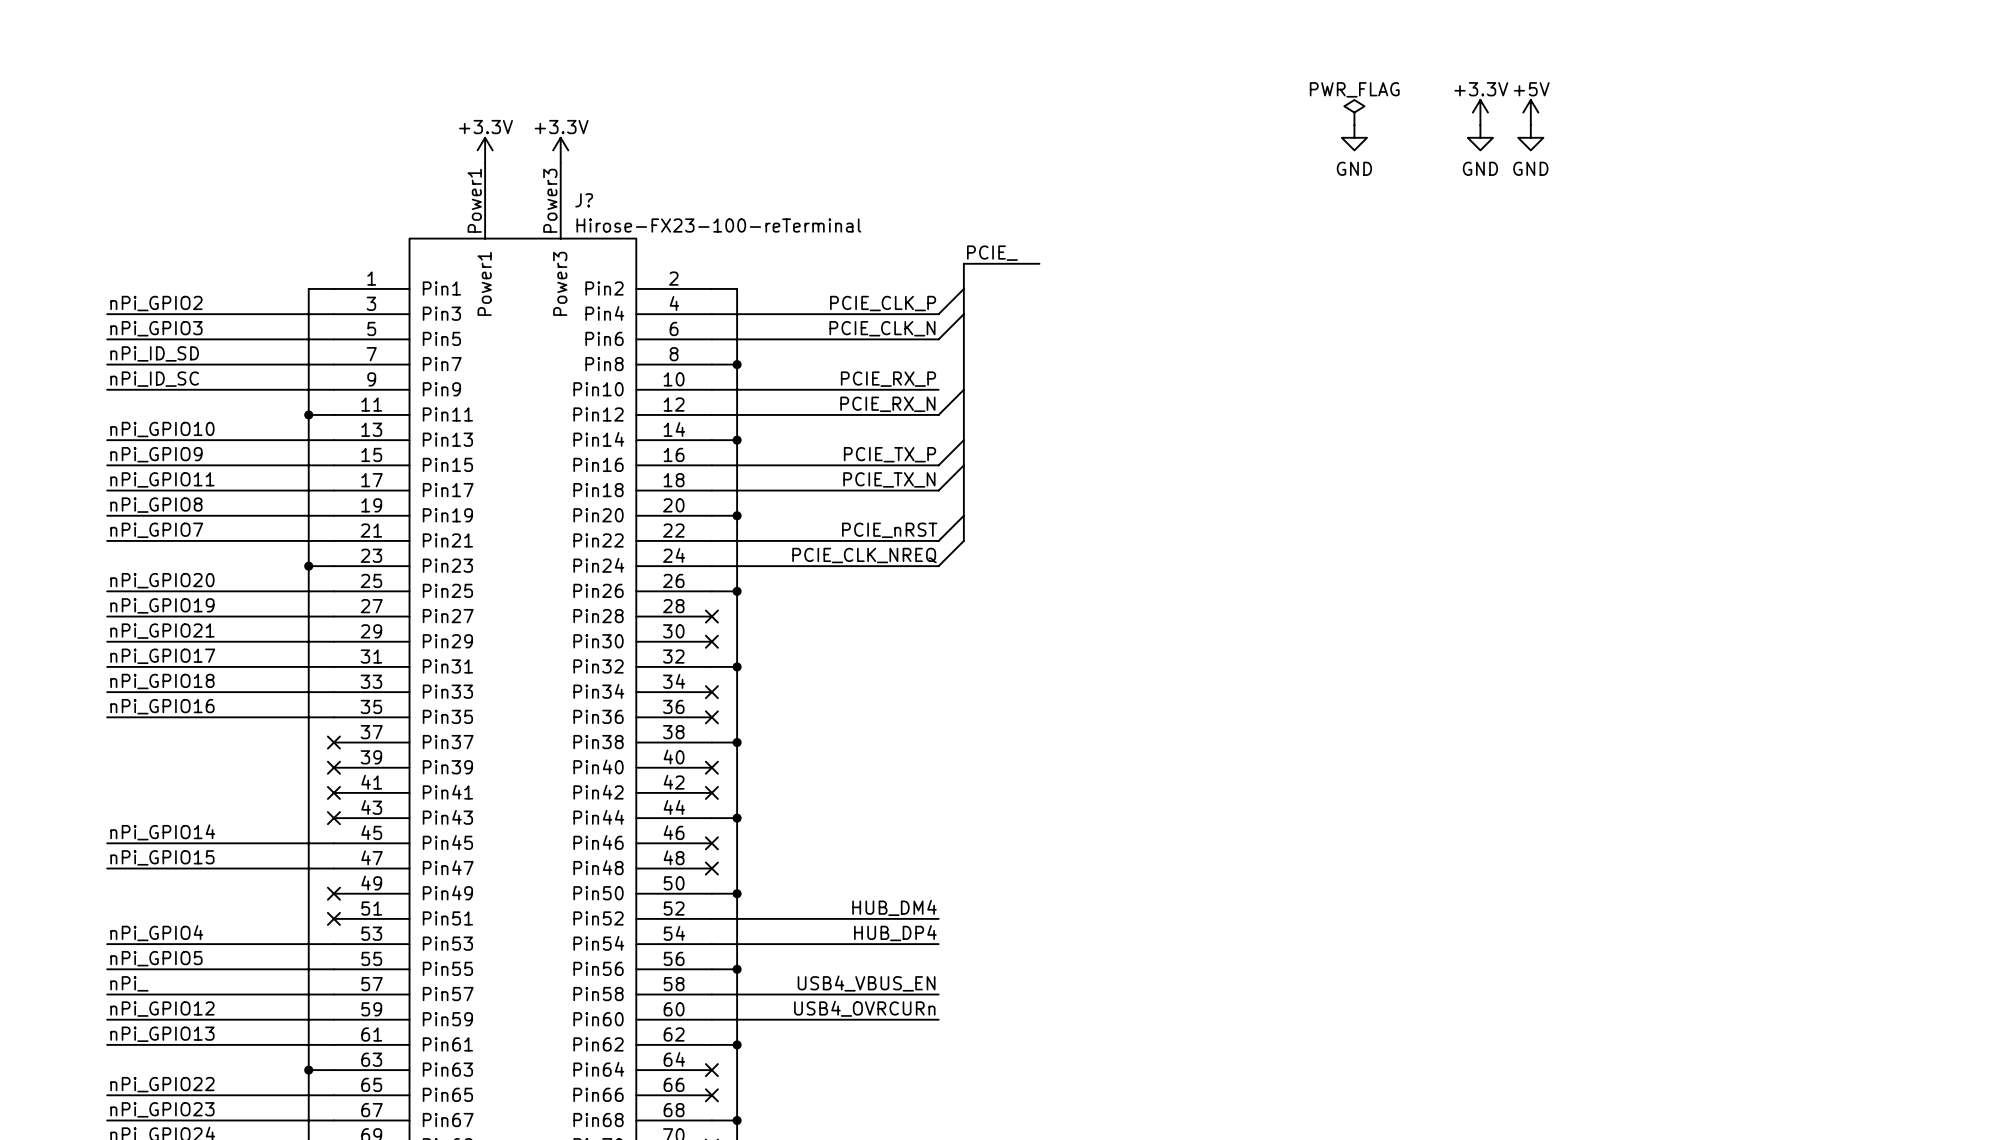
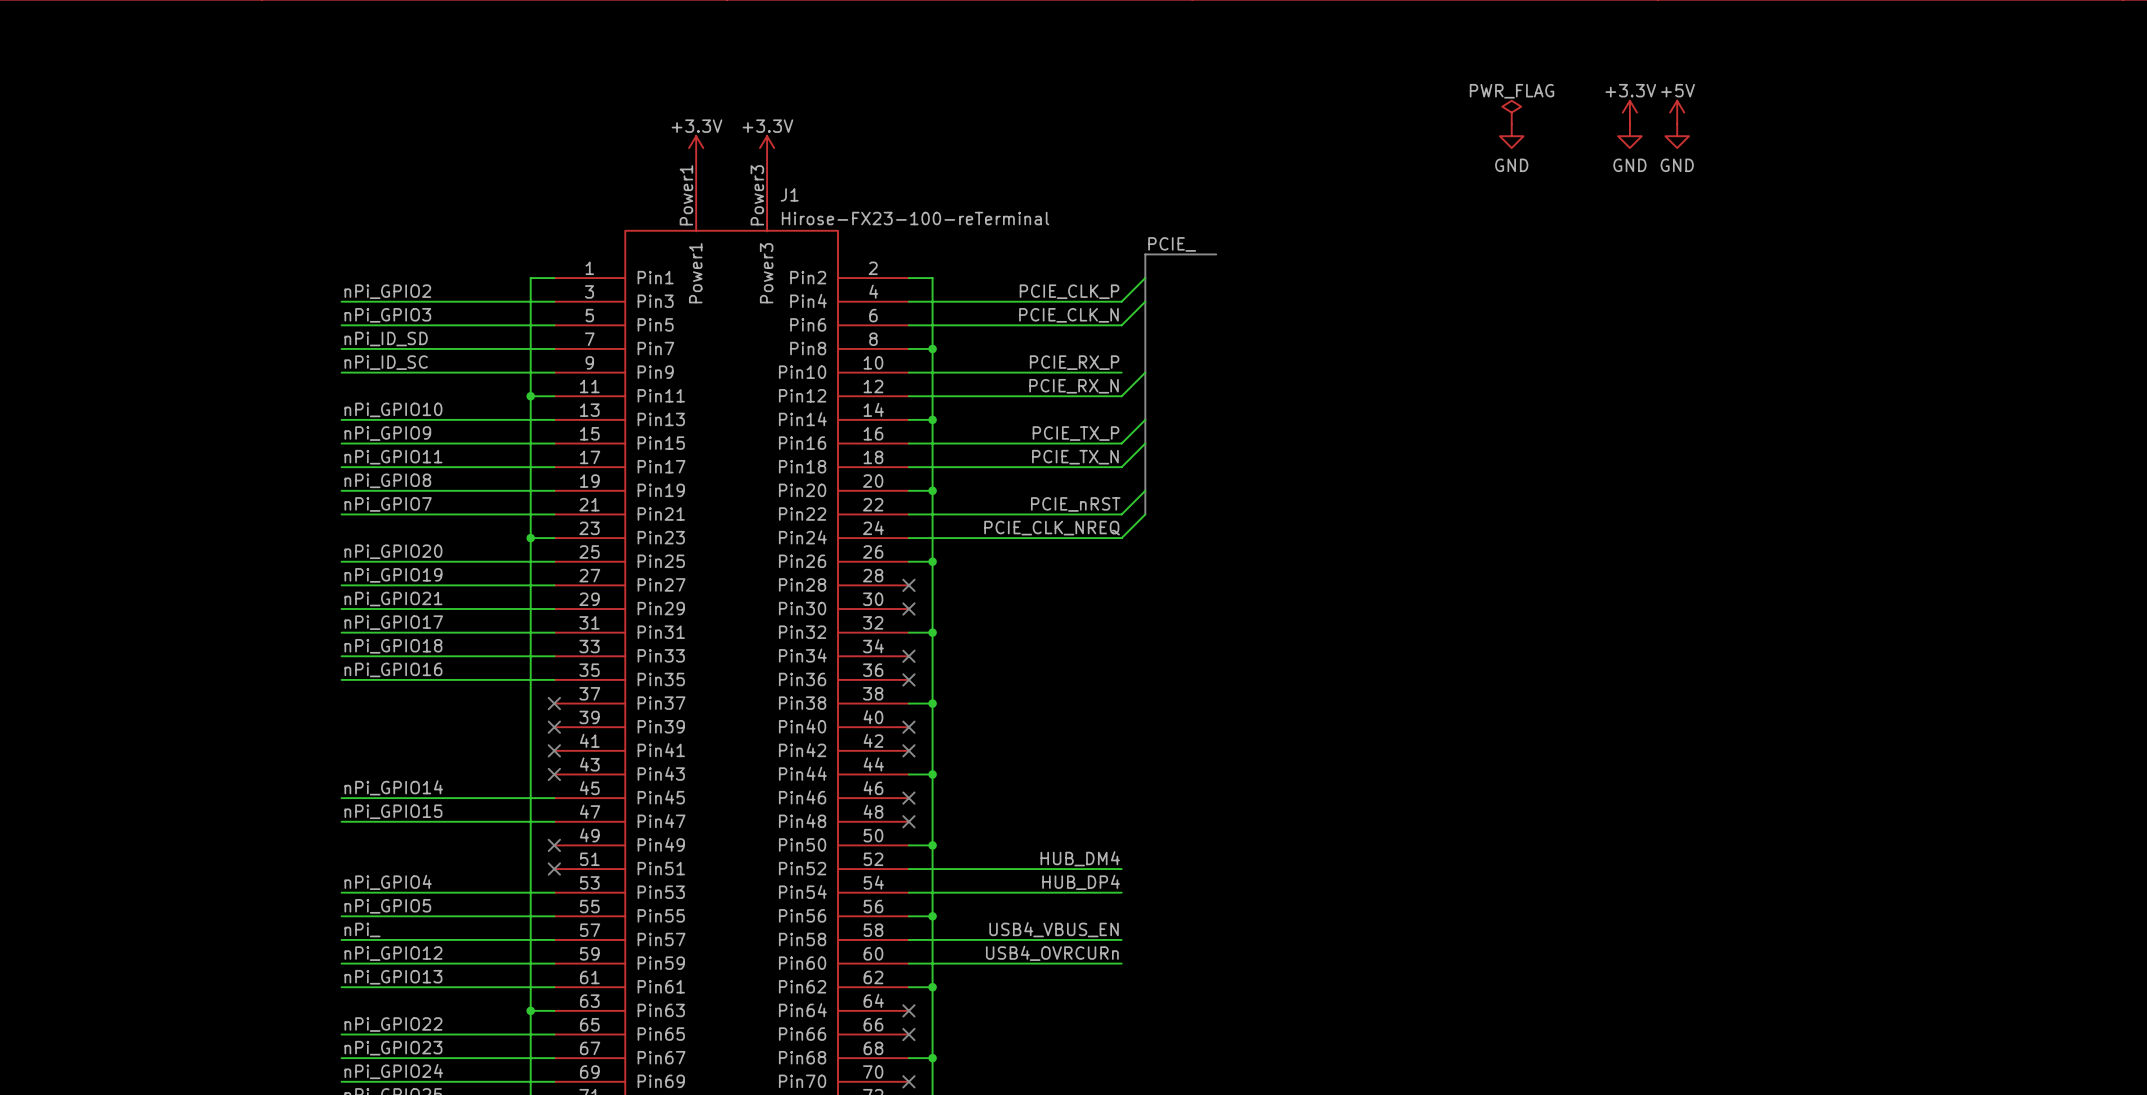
J? name: J? (584, 200) -> J1 (789, 194)

